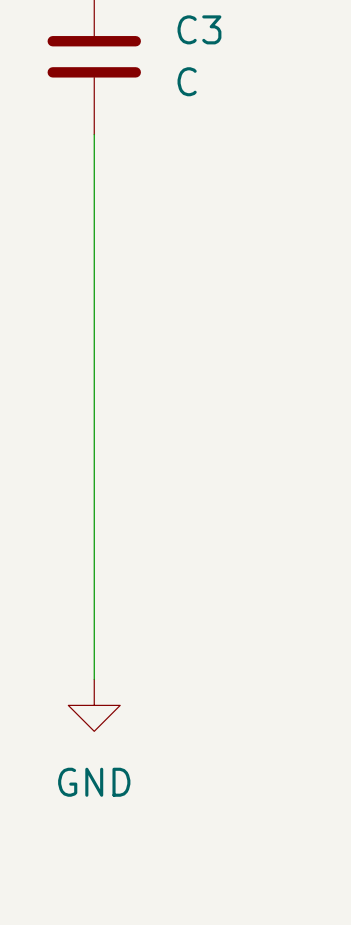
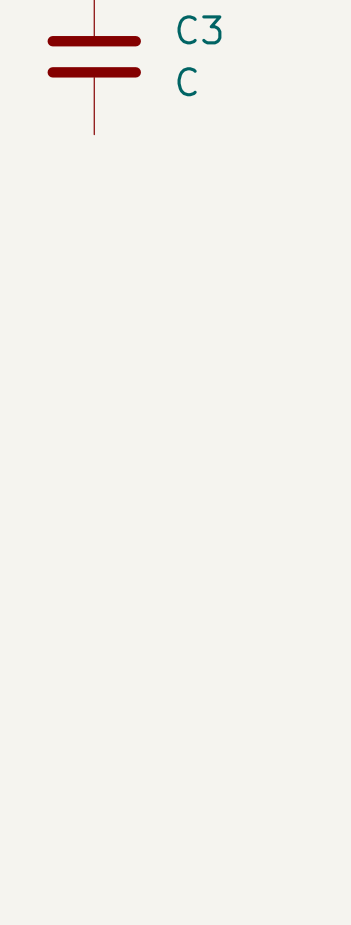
wire: (94, 134) (94, 679) -> none
power symbol: GND (94, 705) -> none

